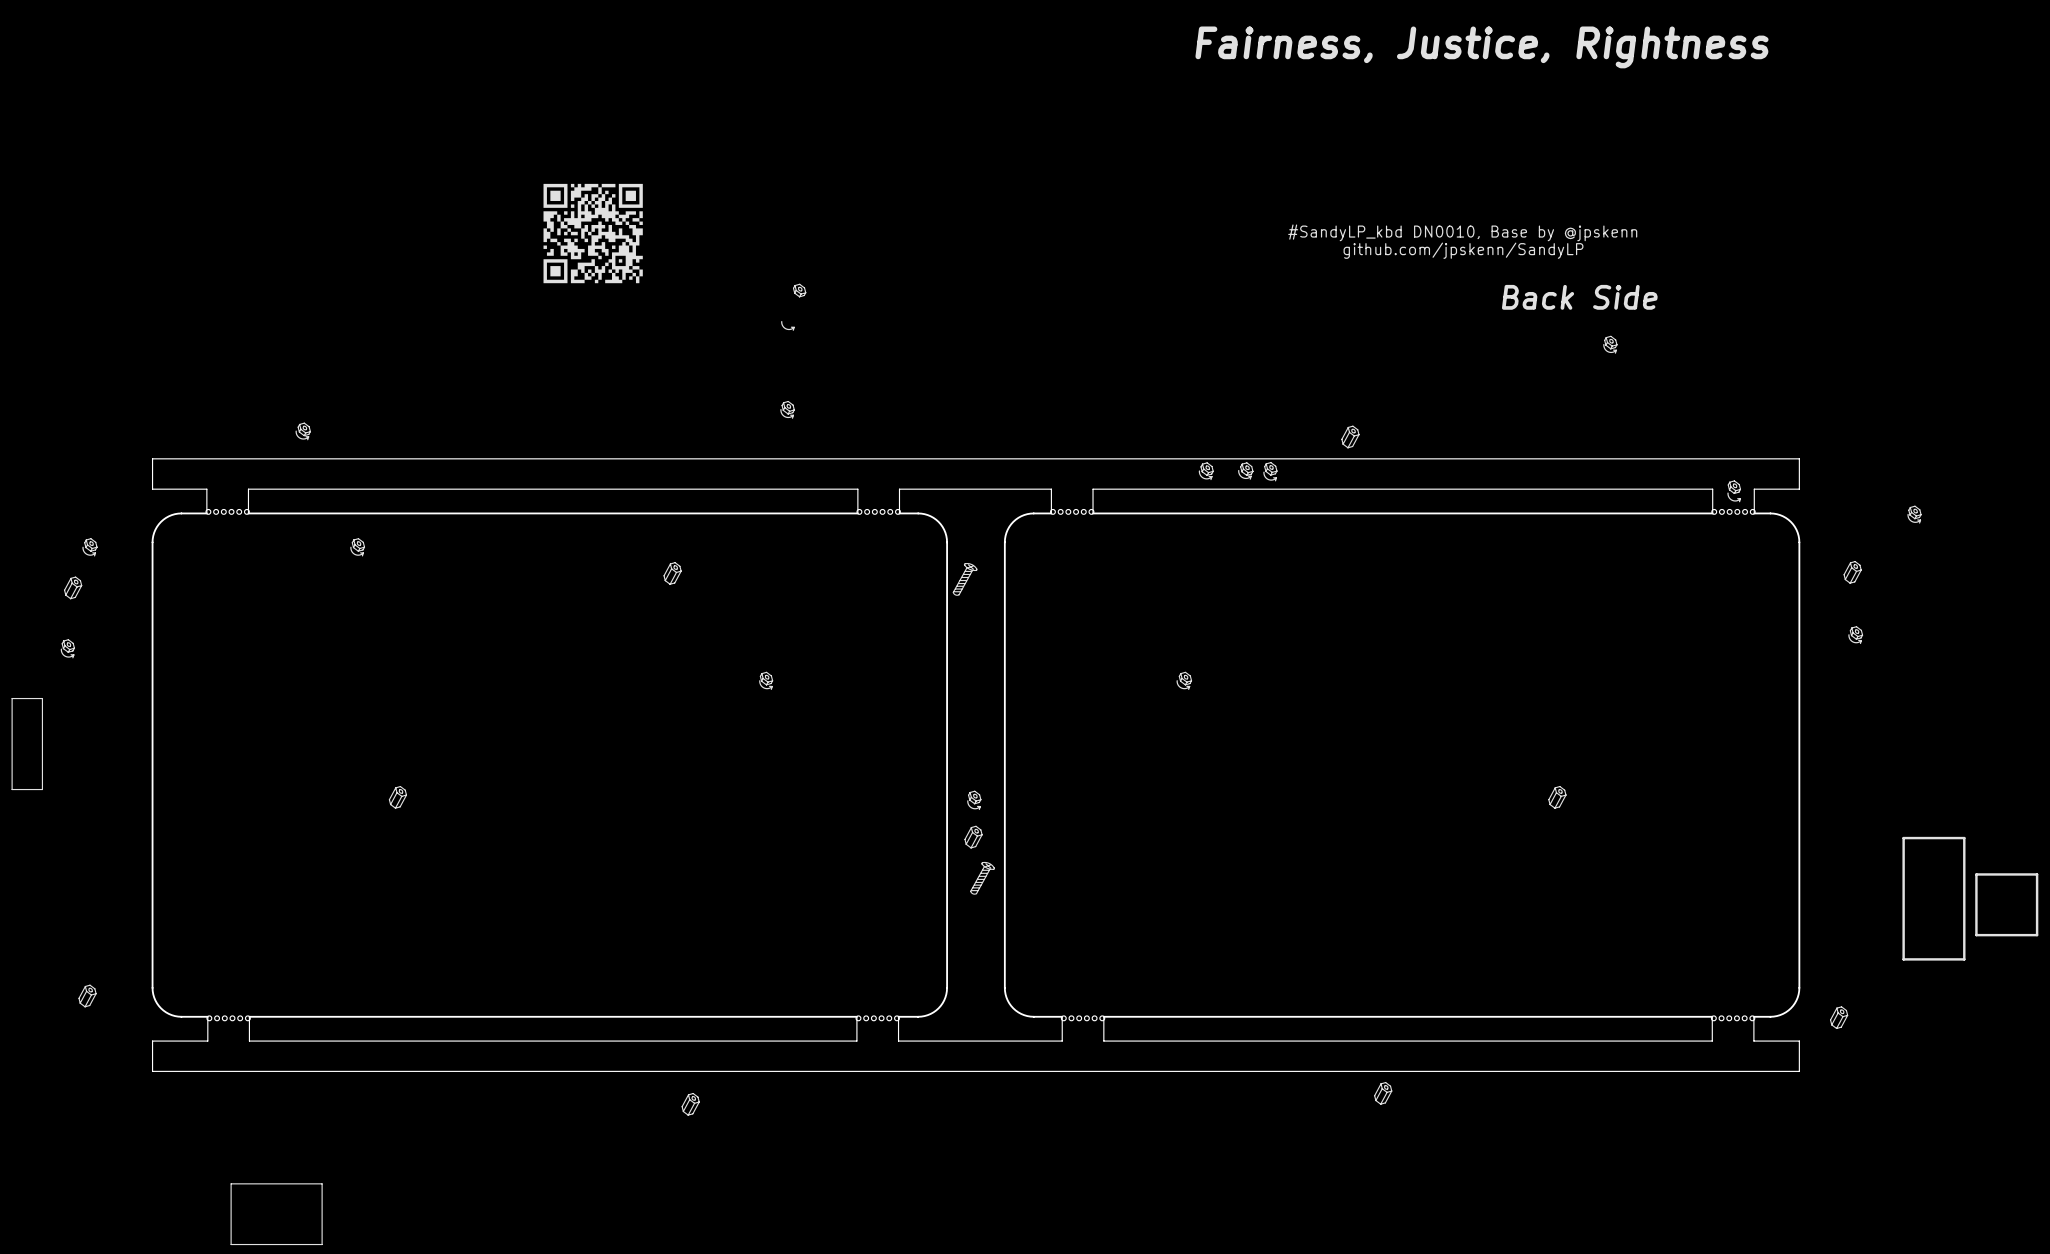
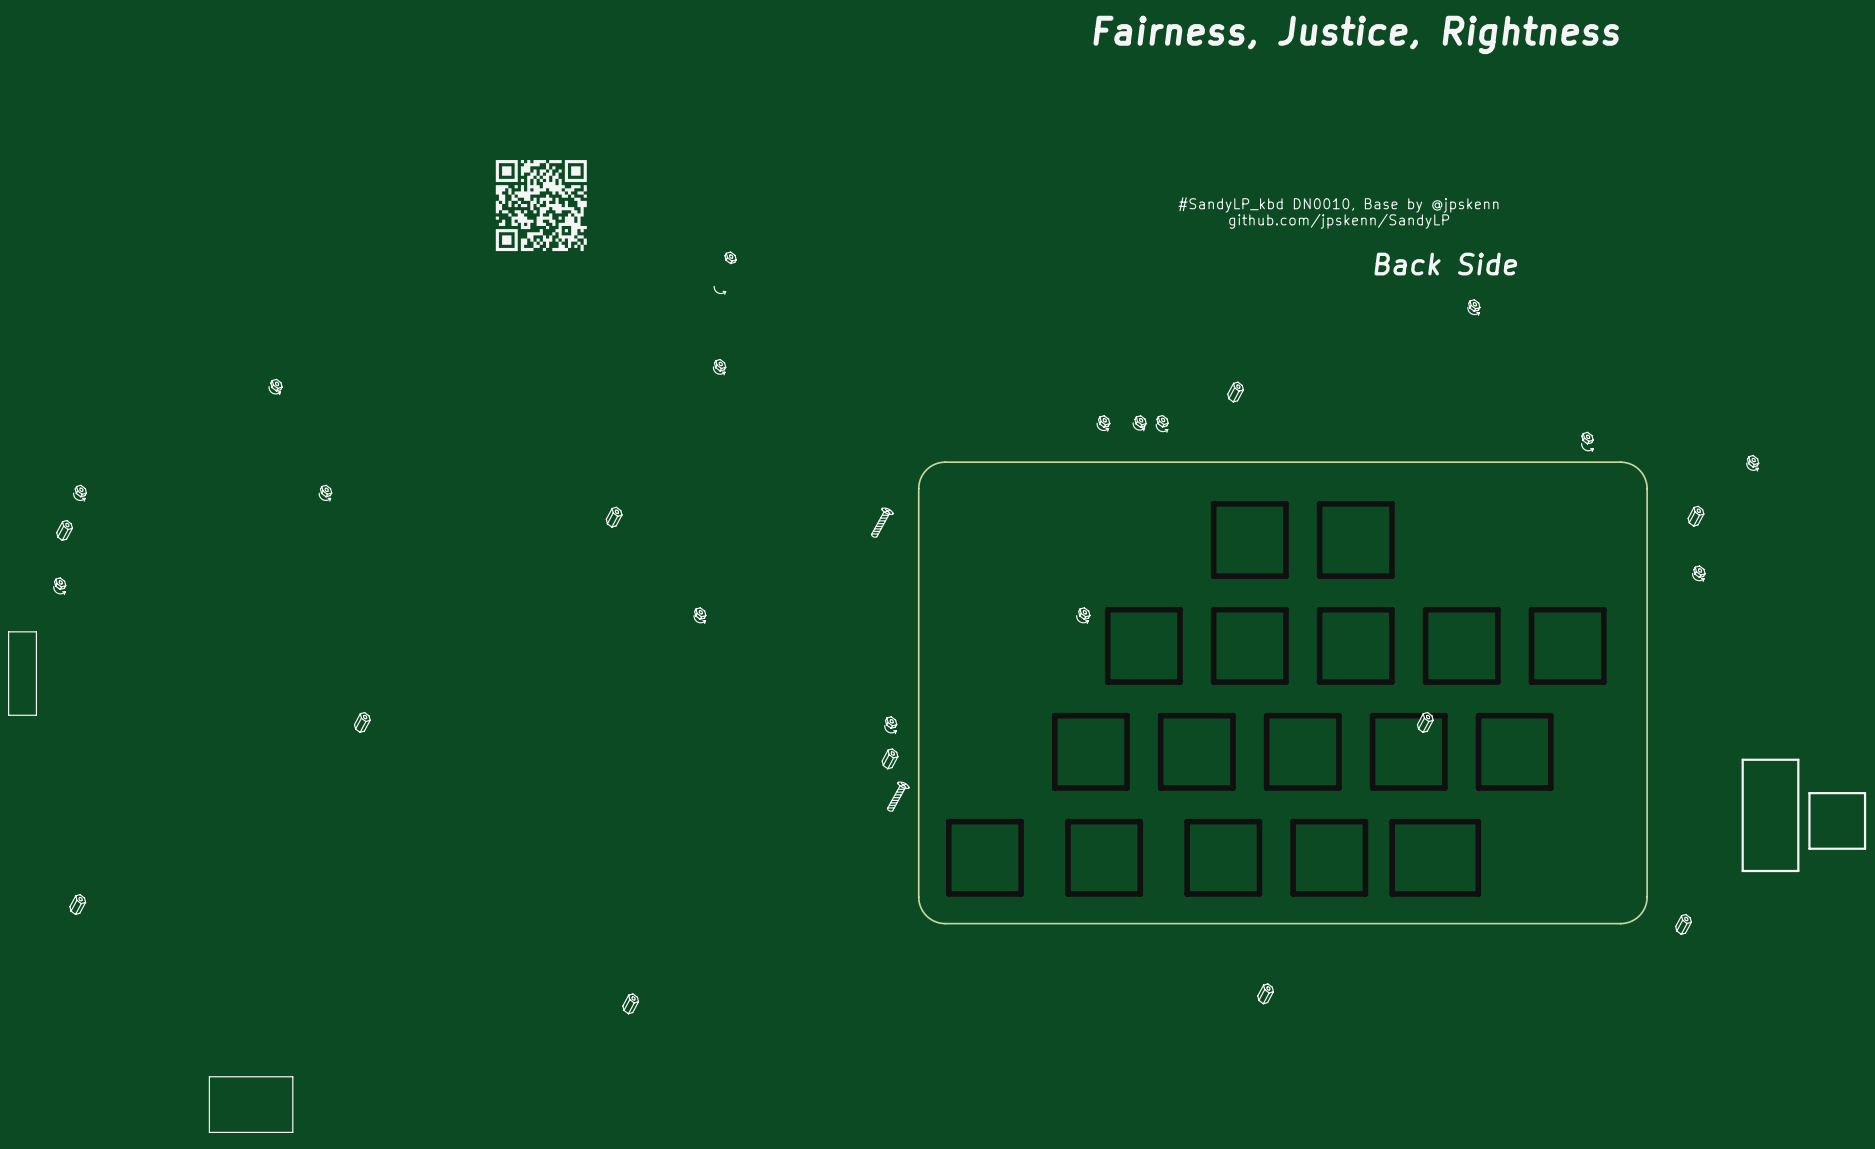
drawing: none -> [917, 461, 1648, 925]
part: (975, 765) -> none

